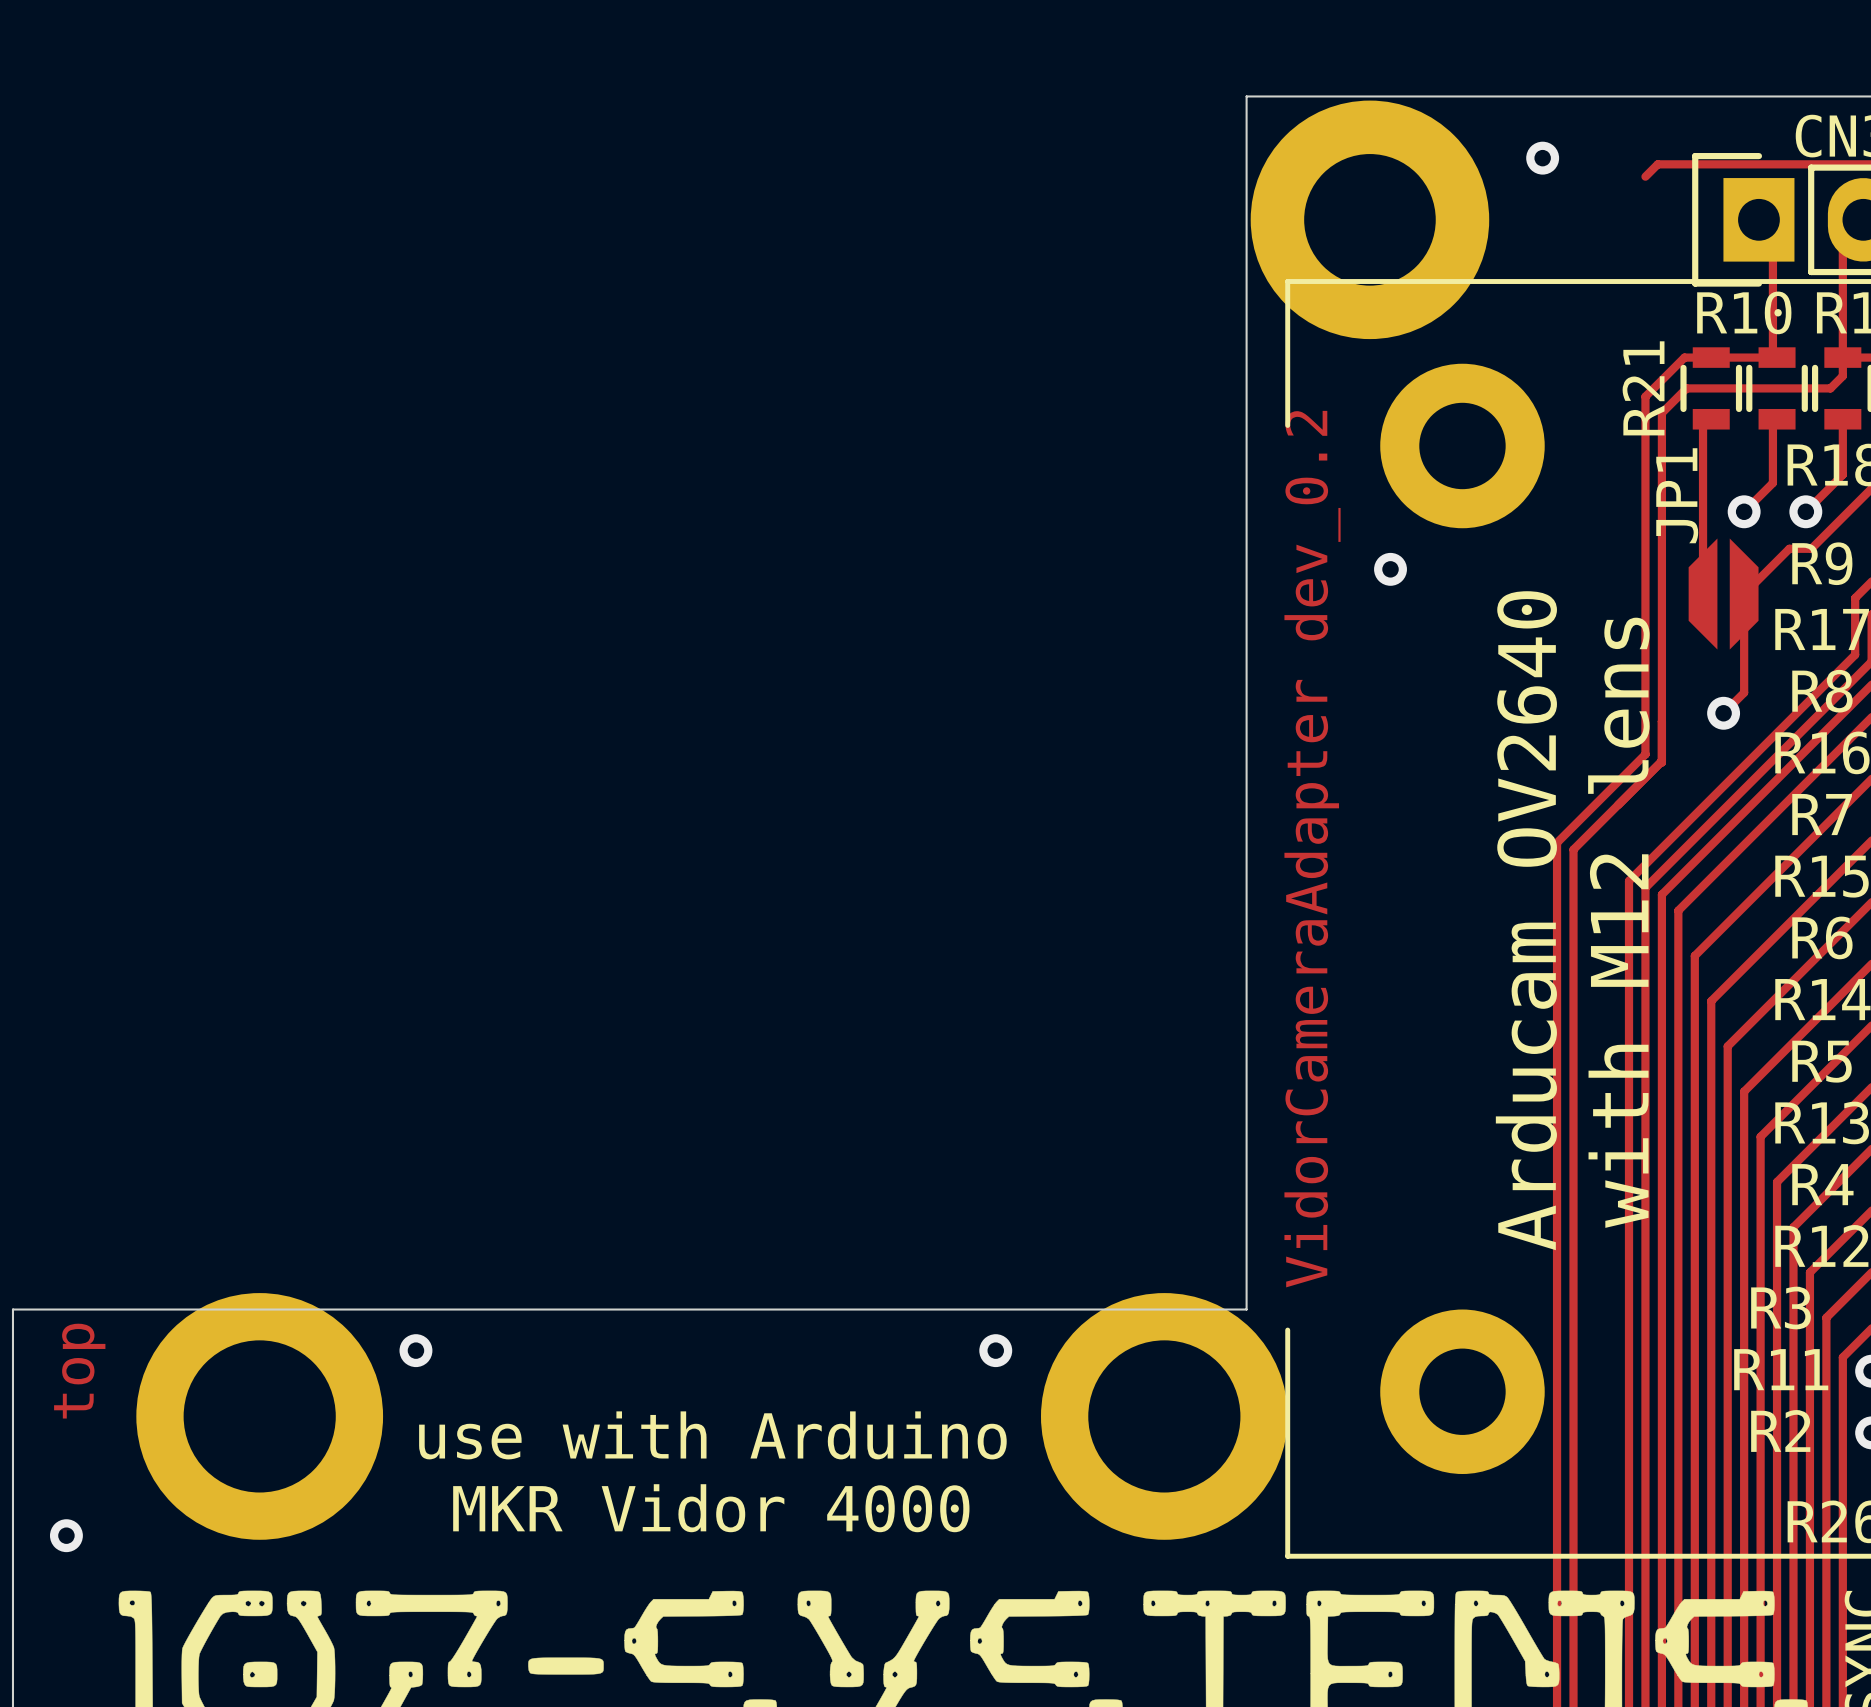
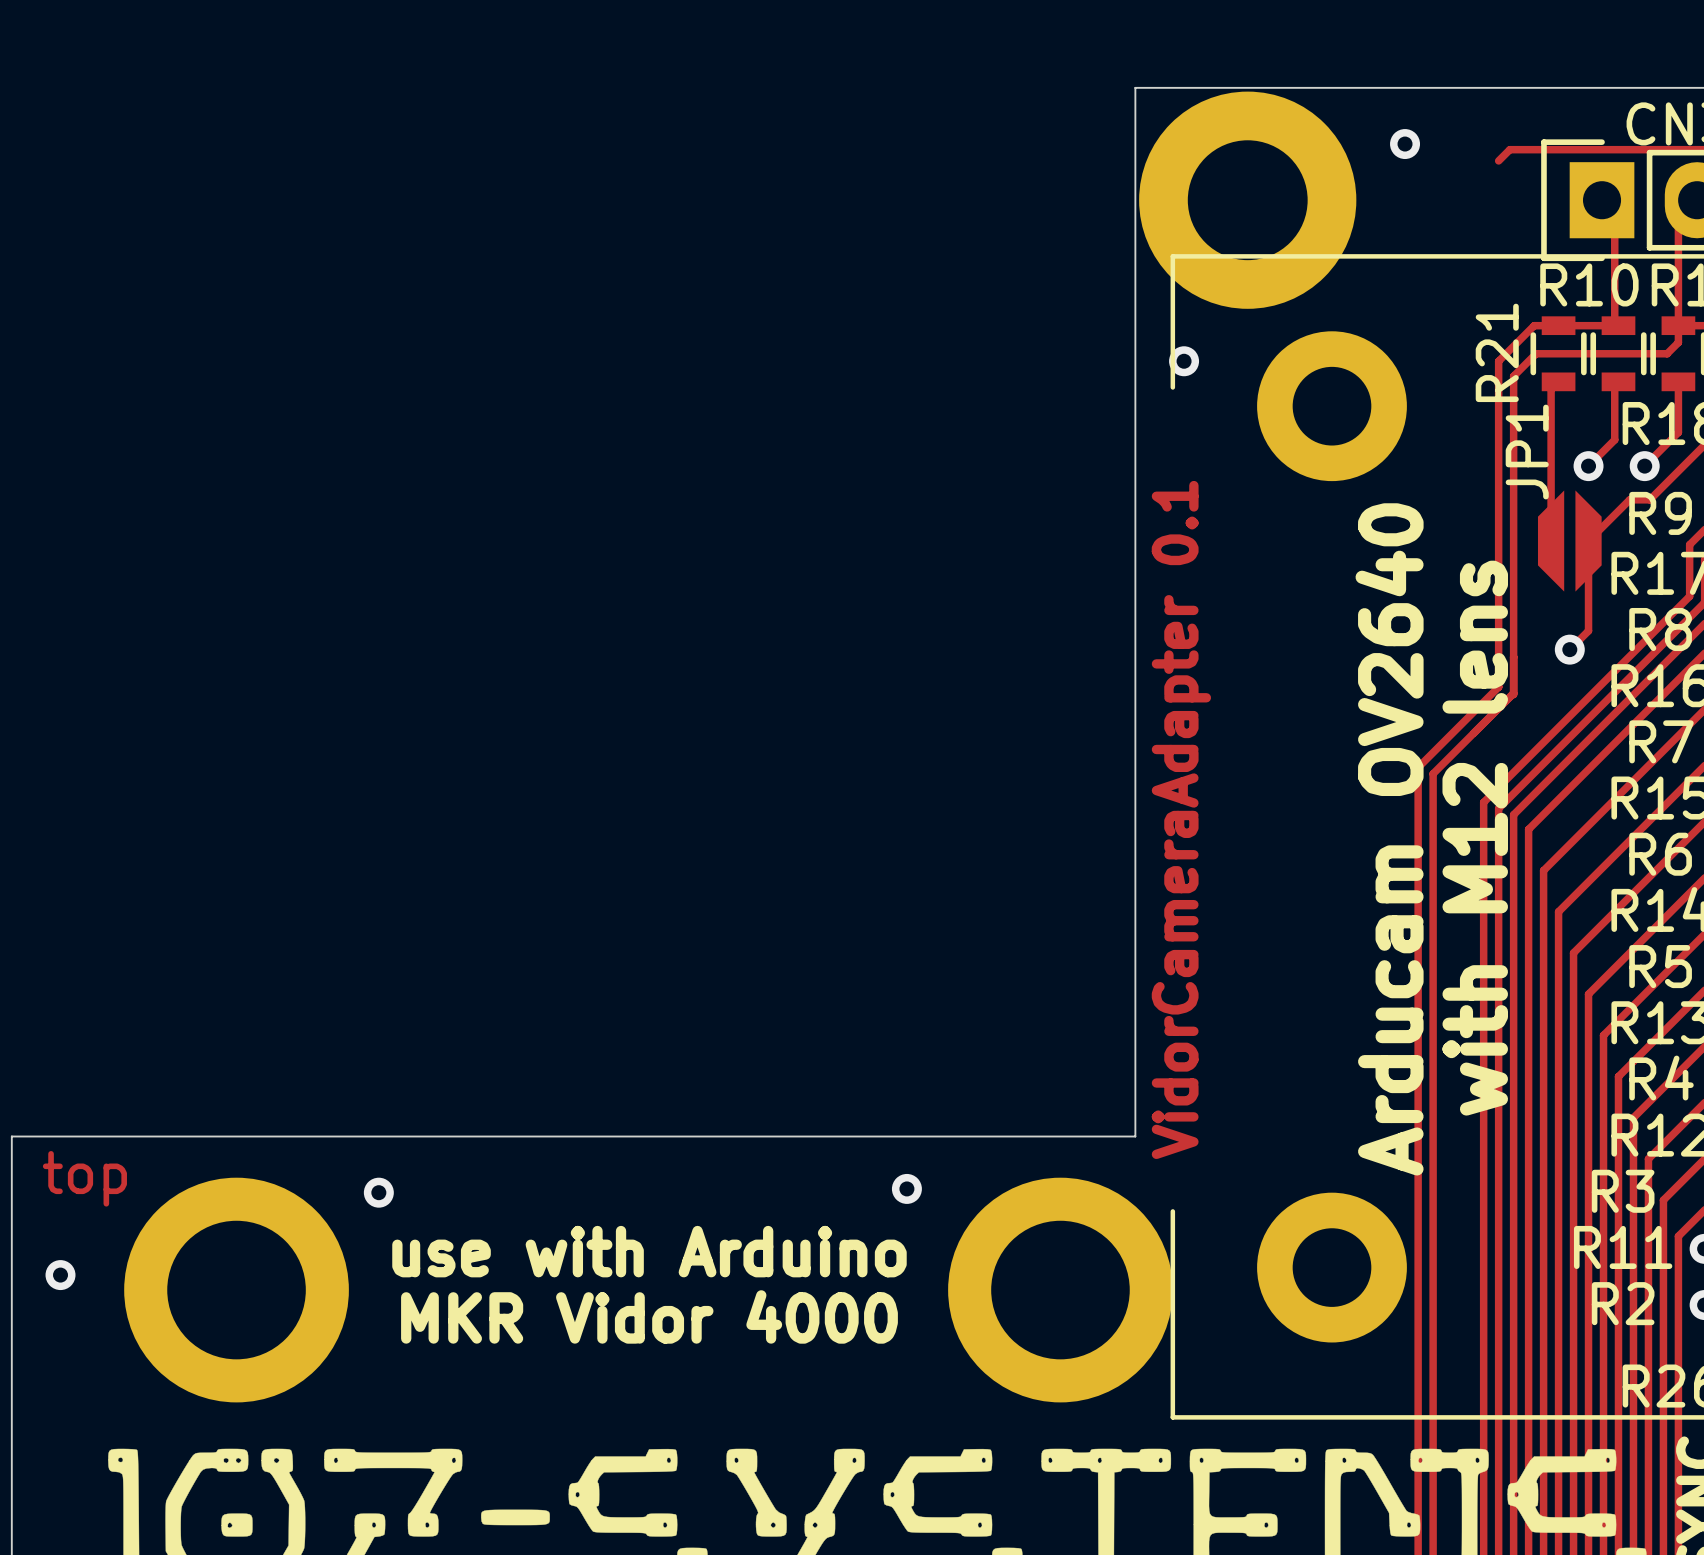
via position: (1390, 569) -> (1184, 361)
text: VidorCameraAdapter dev_0.2 (1312, 849) -> VidorCameraAdapter 0.1 (1181, 819)
board edge: (1246, 1247) (1246, 1309) (12, 1309) -> (1135, 1136) (11, 1136) (11, 1192)
via position: (415, 1350) -> (378, 1192)
via position: (995, 1350) -> (906, 1188)
text rotation: 0° (79, 1371) -> 90° clockwise (84, 1178)
text: none -> use with Arduino (649, 1251)
text: use with Arduino (712, 1435) -> MKR Vidor 4000 (649, 1316)
text: MKR Vidor 4000 (711, 1508) -> none
via position: (66, 1535) -> (60, 1275)

